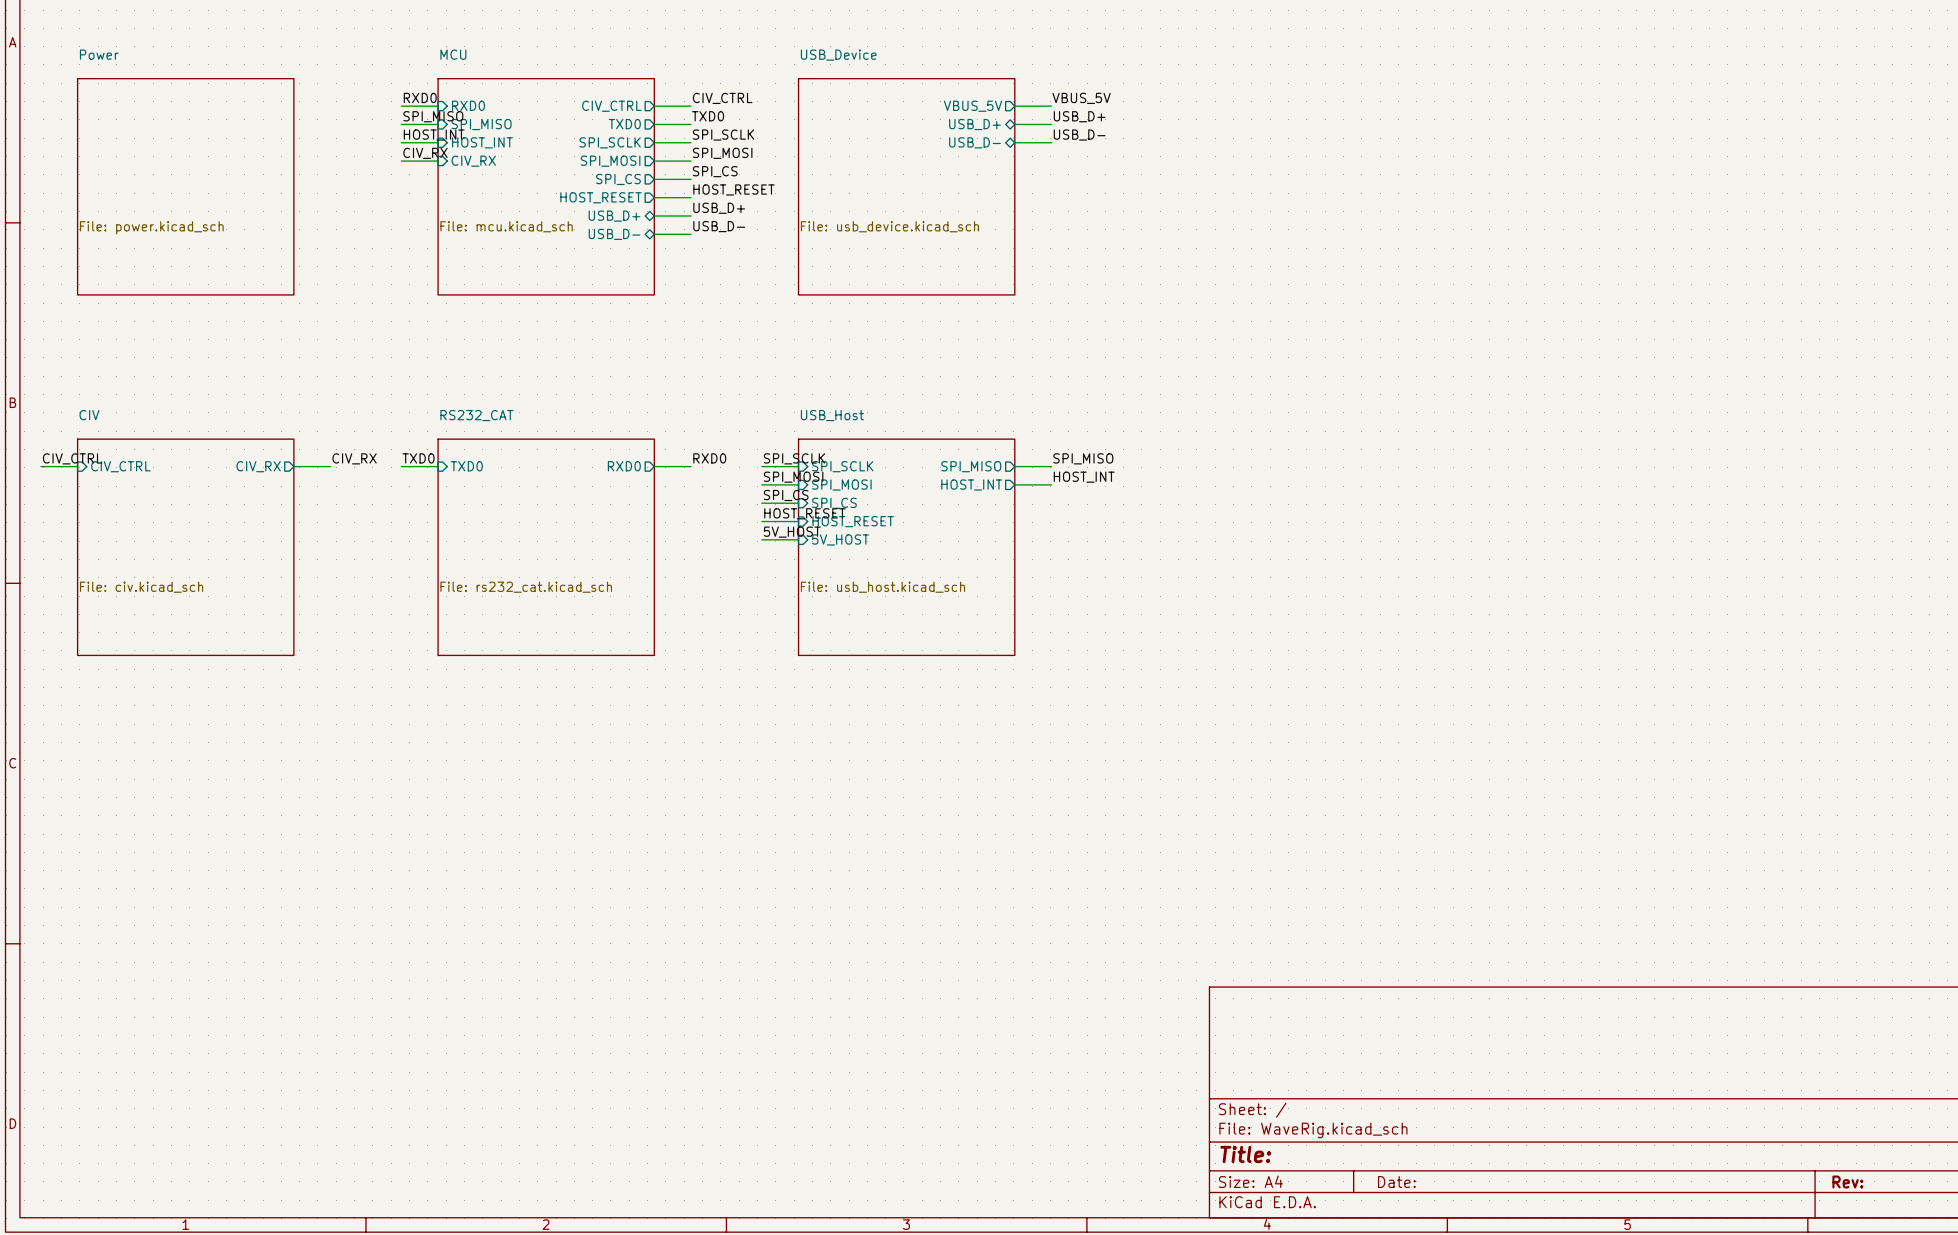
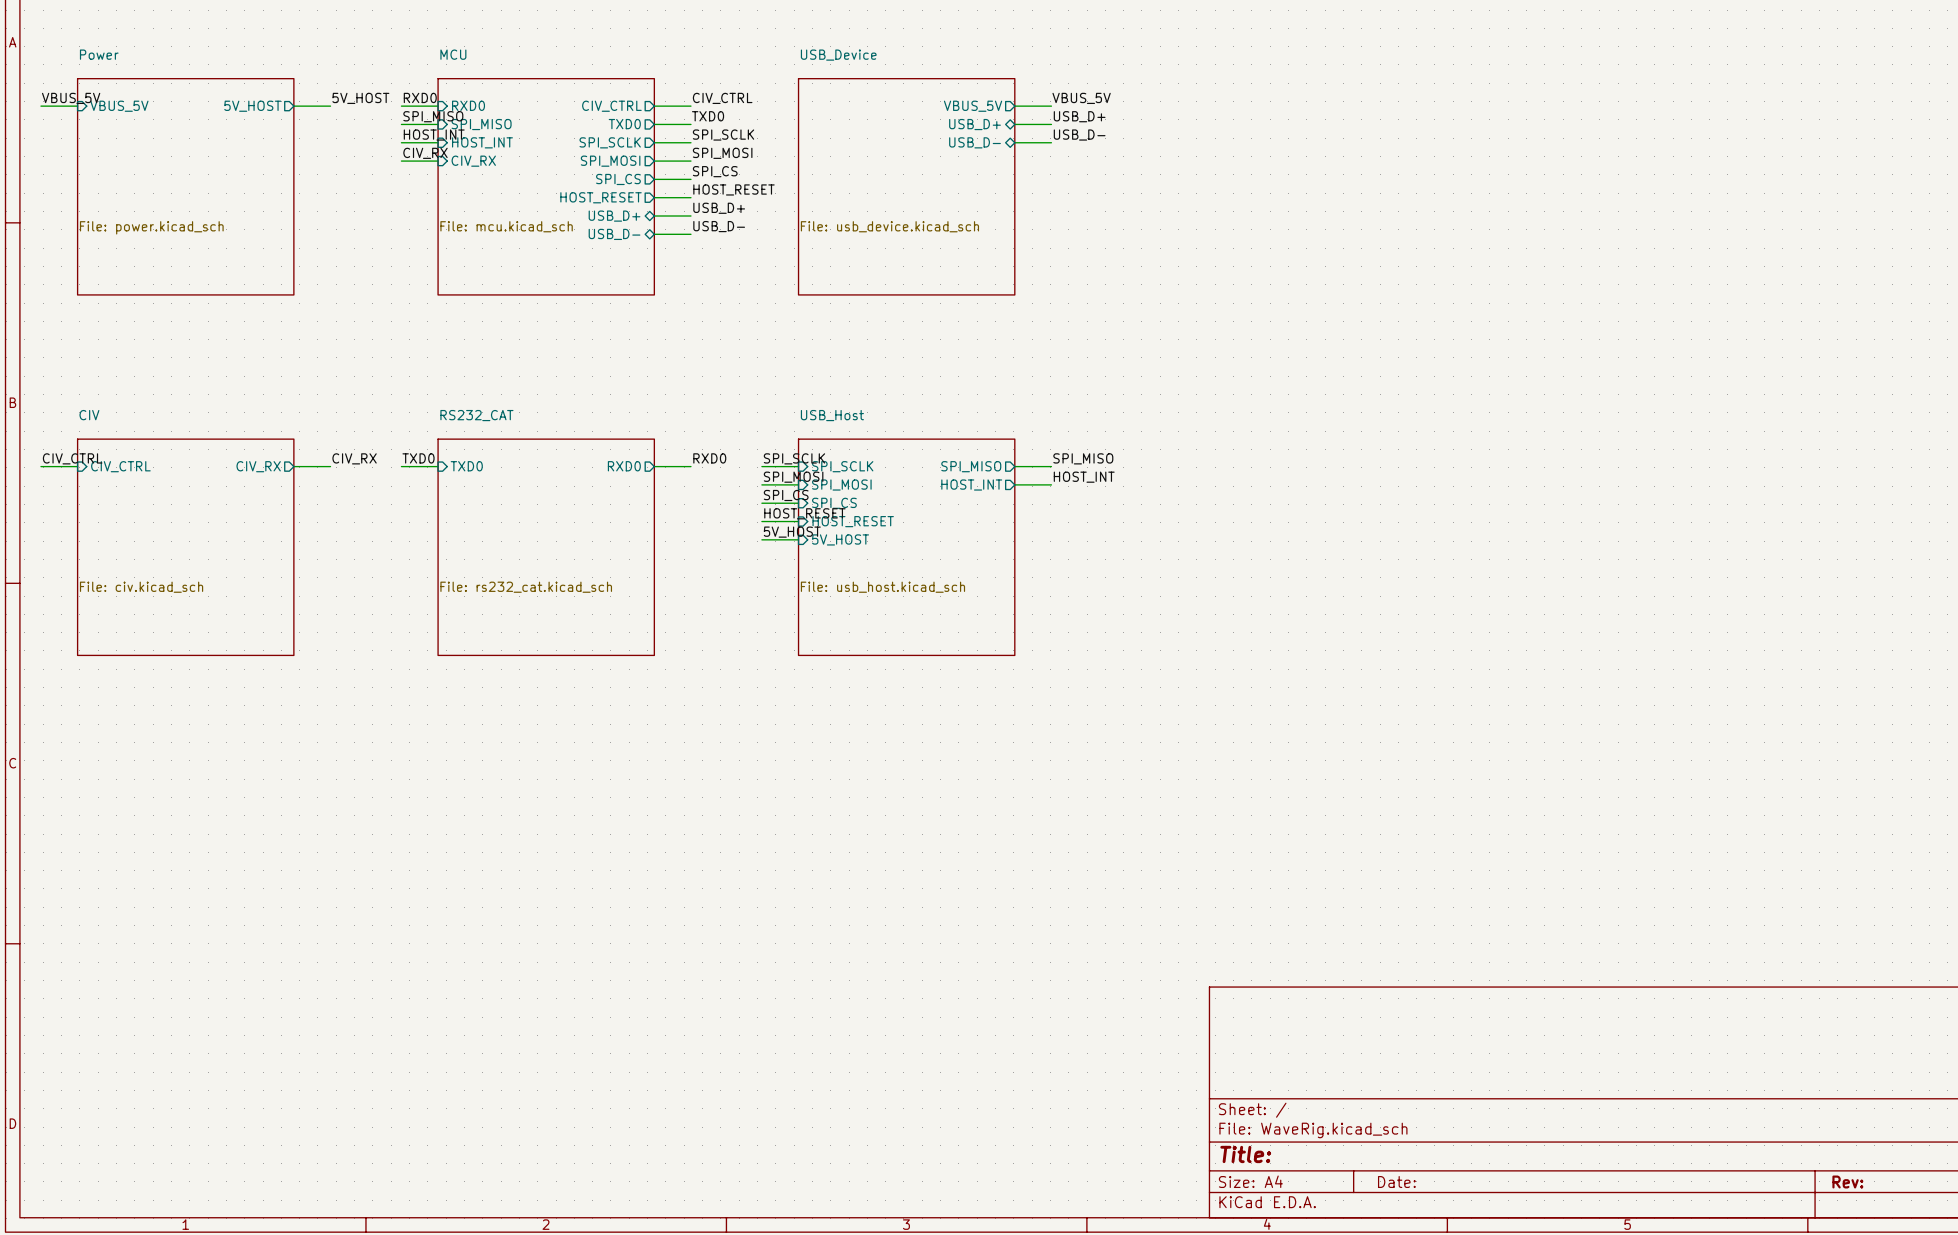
label: none -> VBUS_5V (71, 98)
label: none -> 5V_HOST (360, 98)
wire: none -> (40, 106) (77, 106)
sheet pin: none -> VBUS_5V (119, 106)
sheet pin: none -> 5V_HOST (252, 106)
wire: none -> (293, 106) (330, 106)

